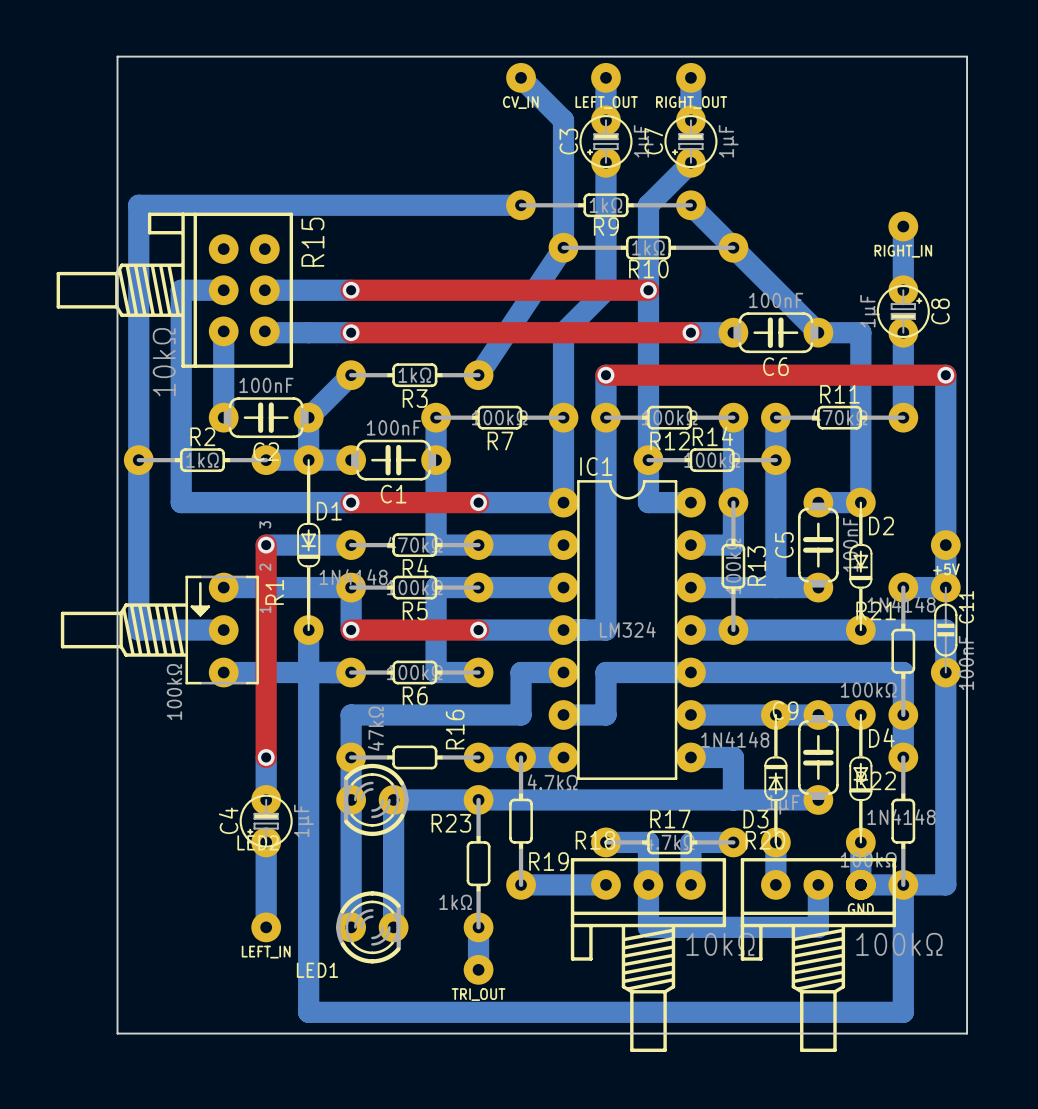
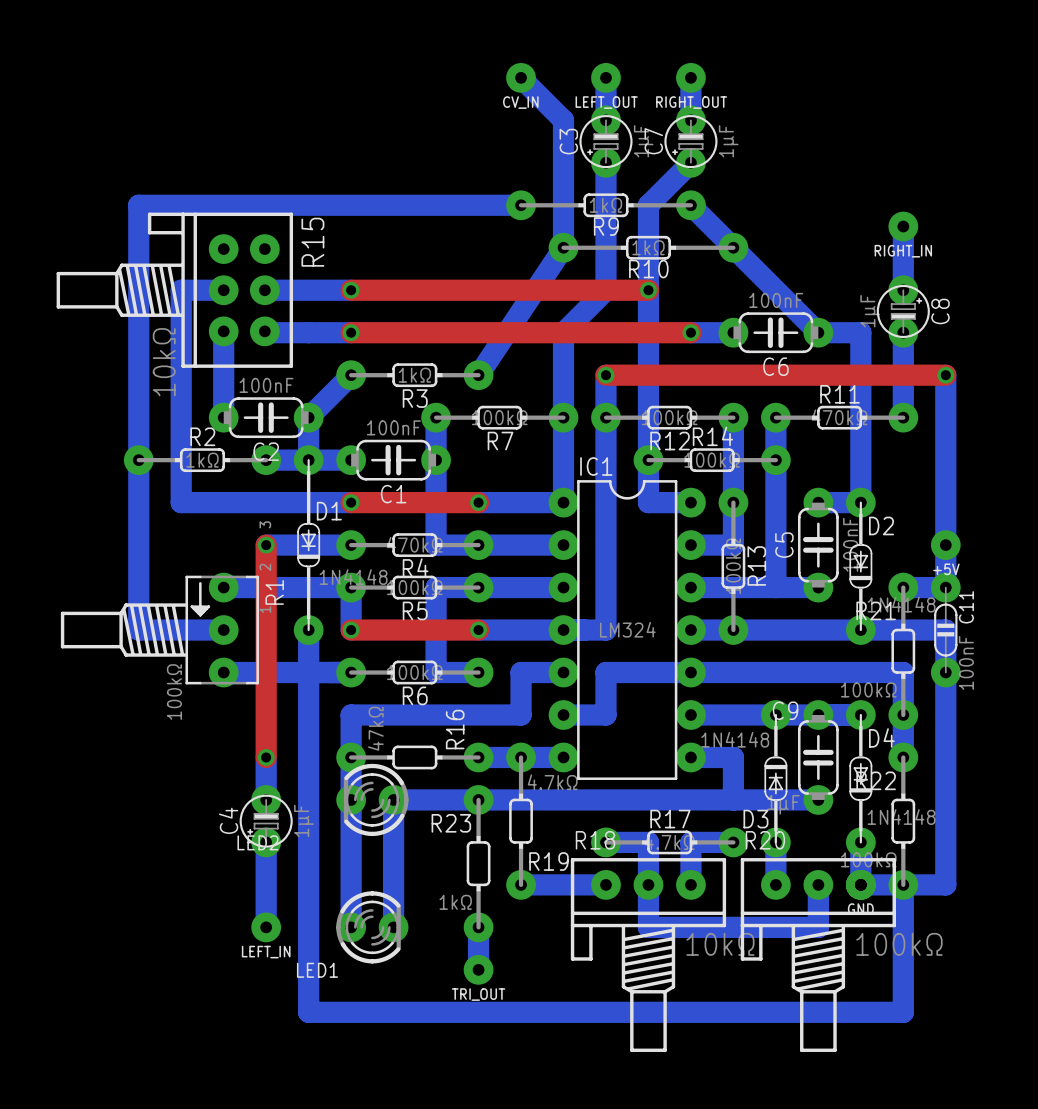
board edge: (117, 56) (967, 56) (967, 1033) (117, 1033) (117, 56) -> none

